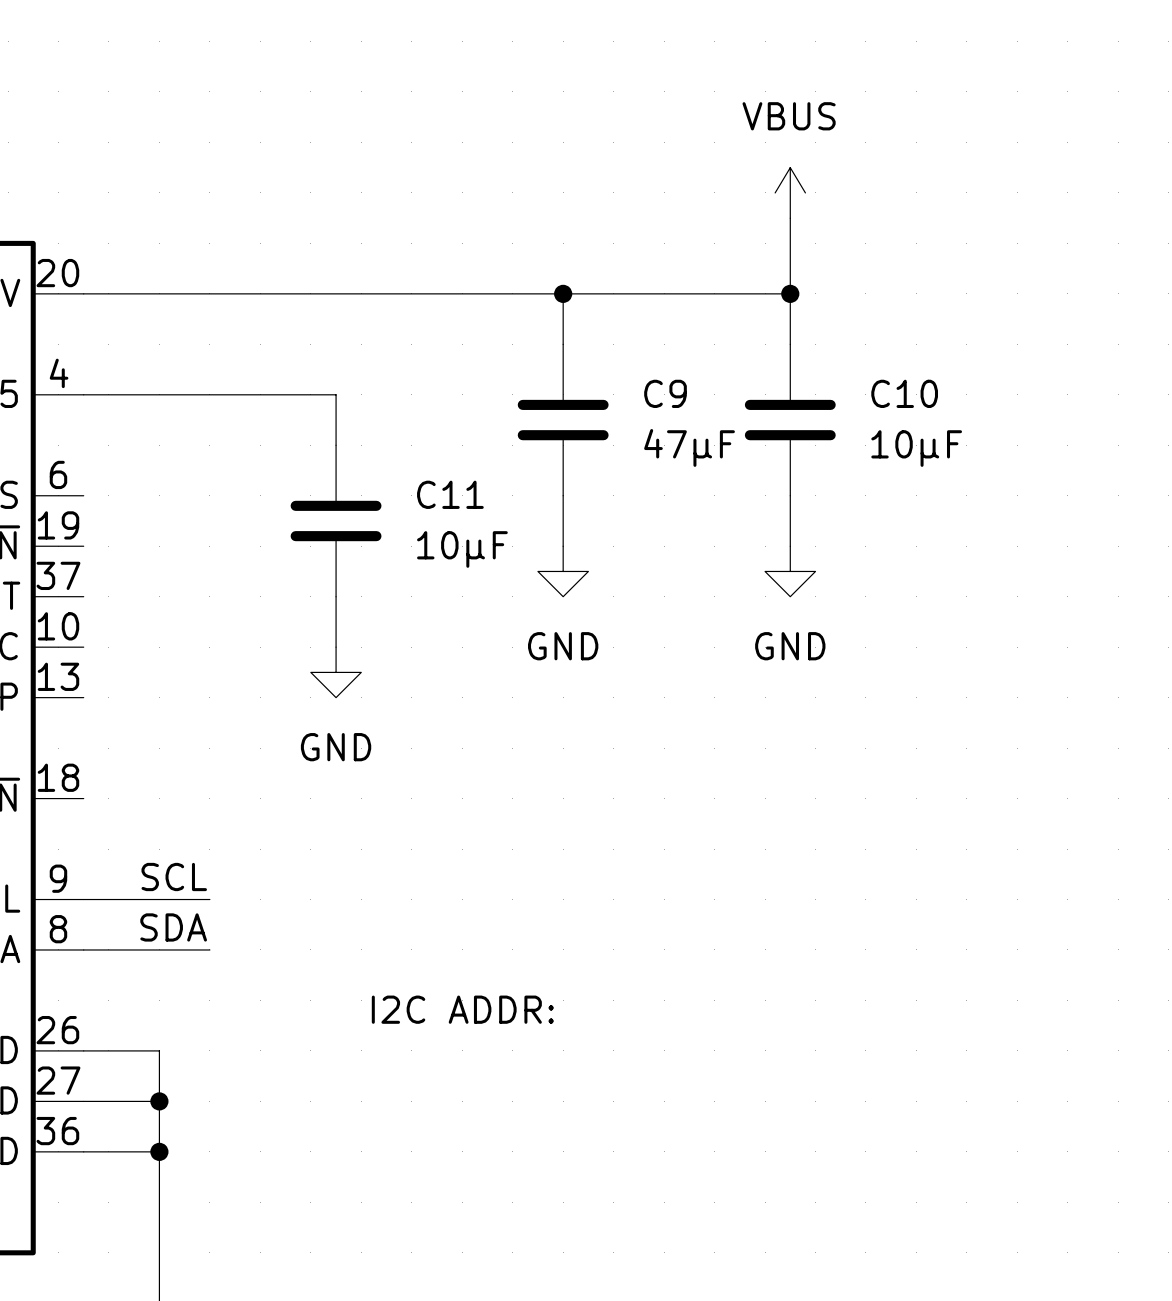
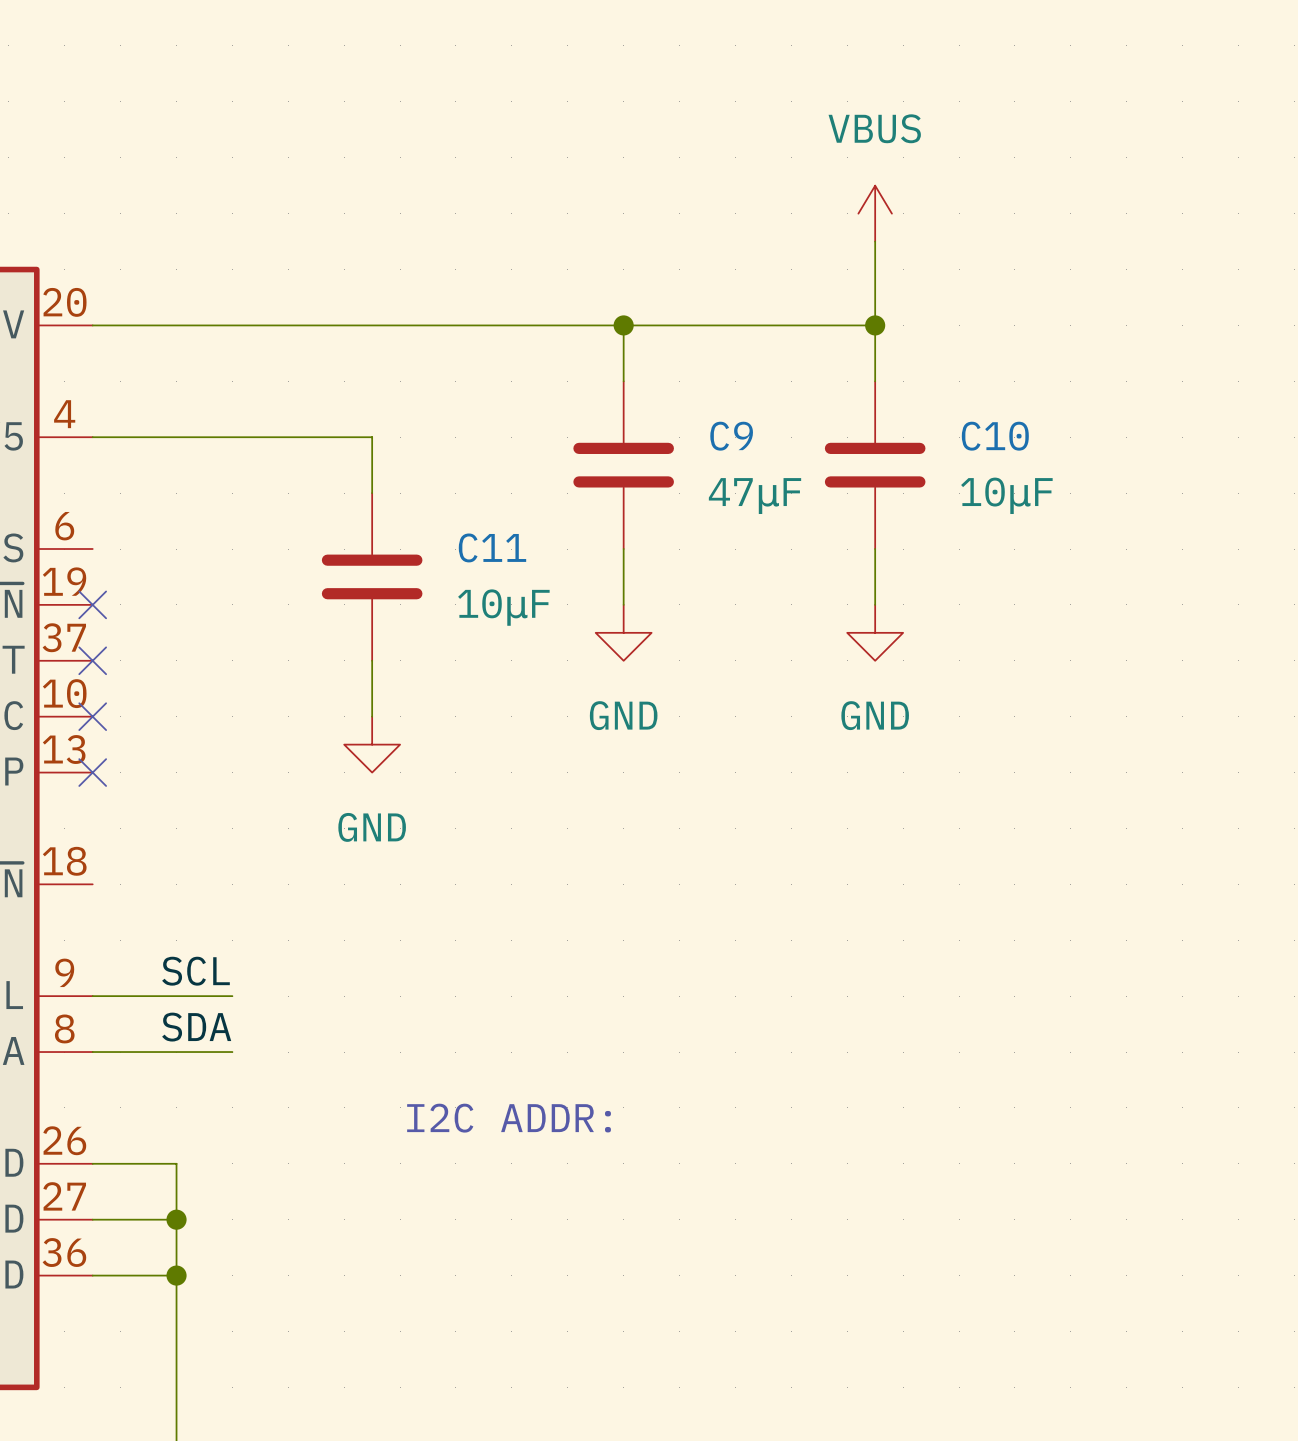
no-connect mark: none -> (92, 604)
no-connect mark: none -> (92, 660)
no-connect mark: none -> (92, 716)
no-connect mark: none -> (92, 772)

